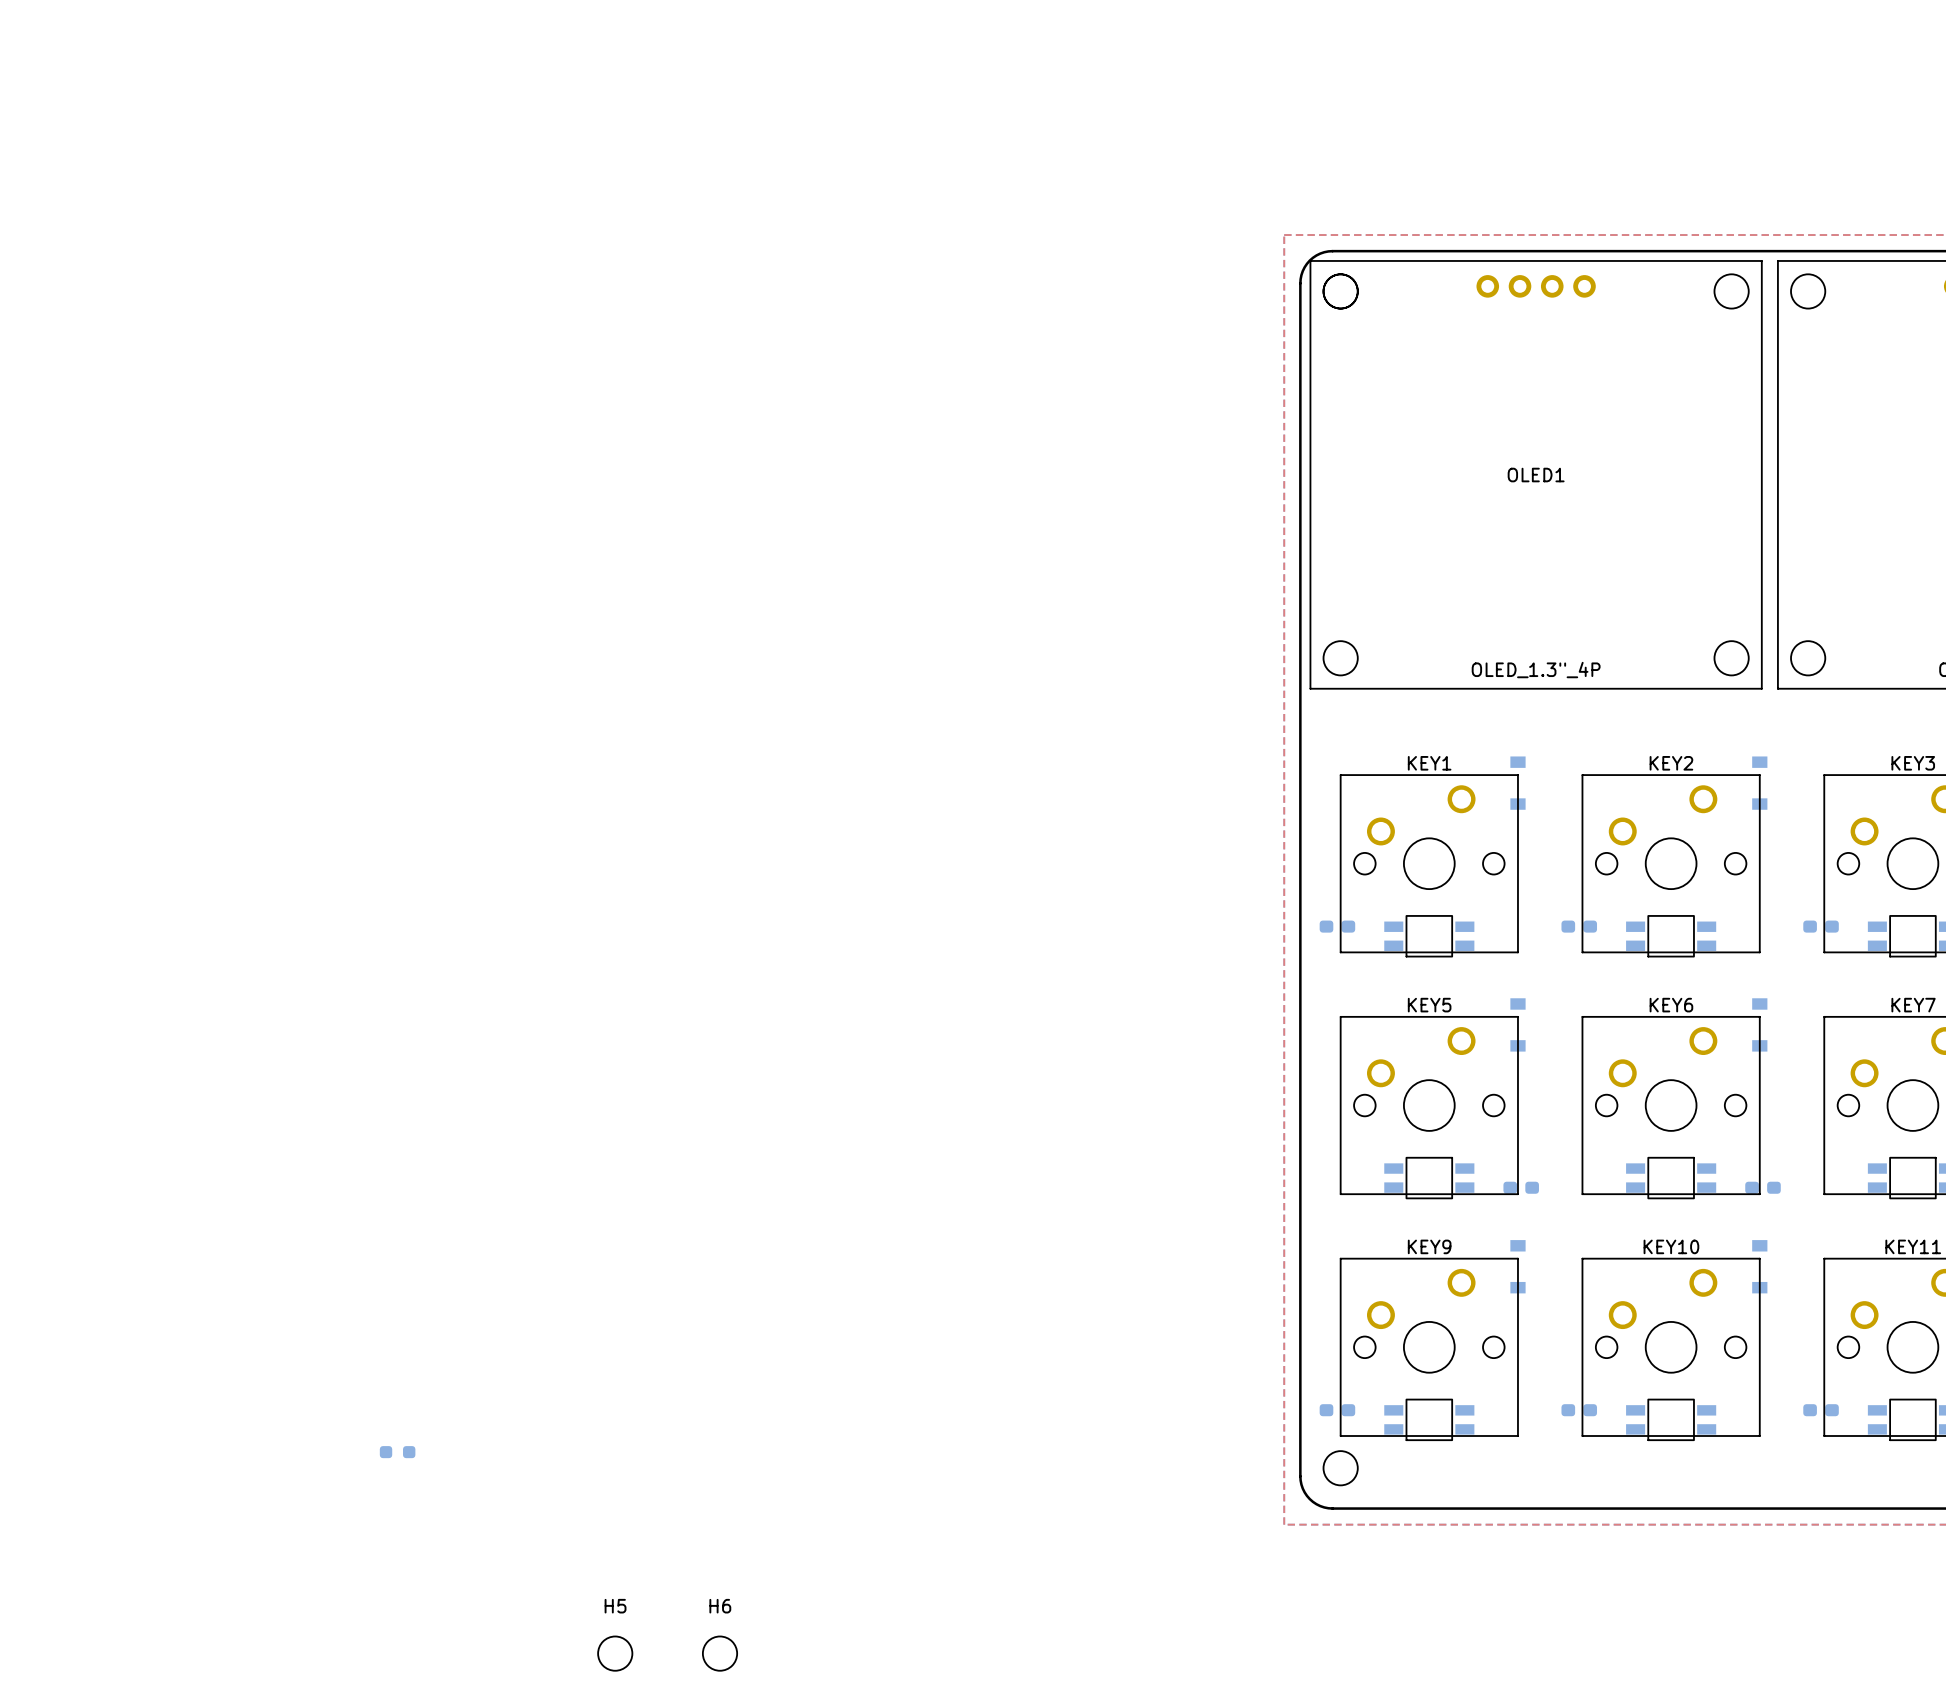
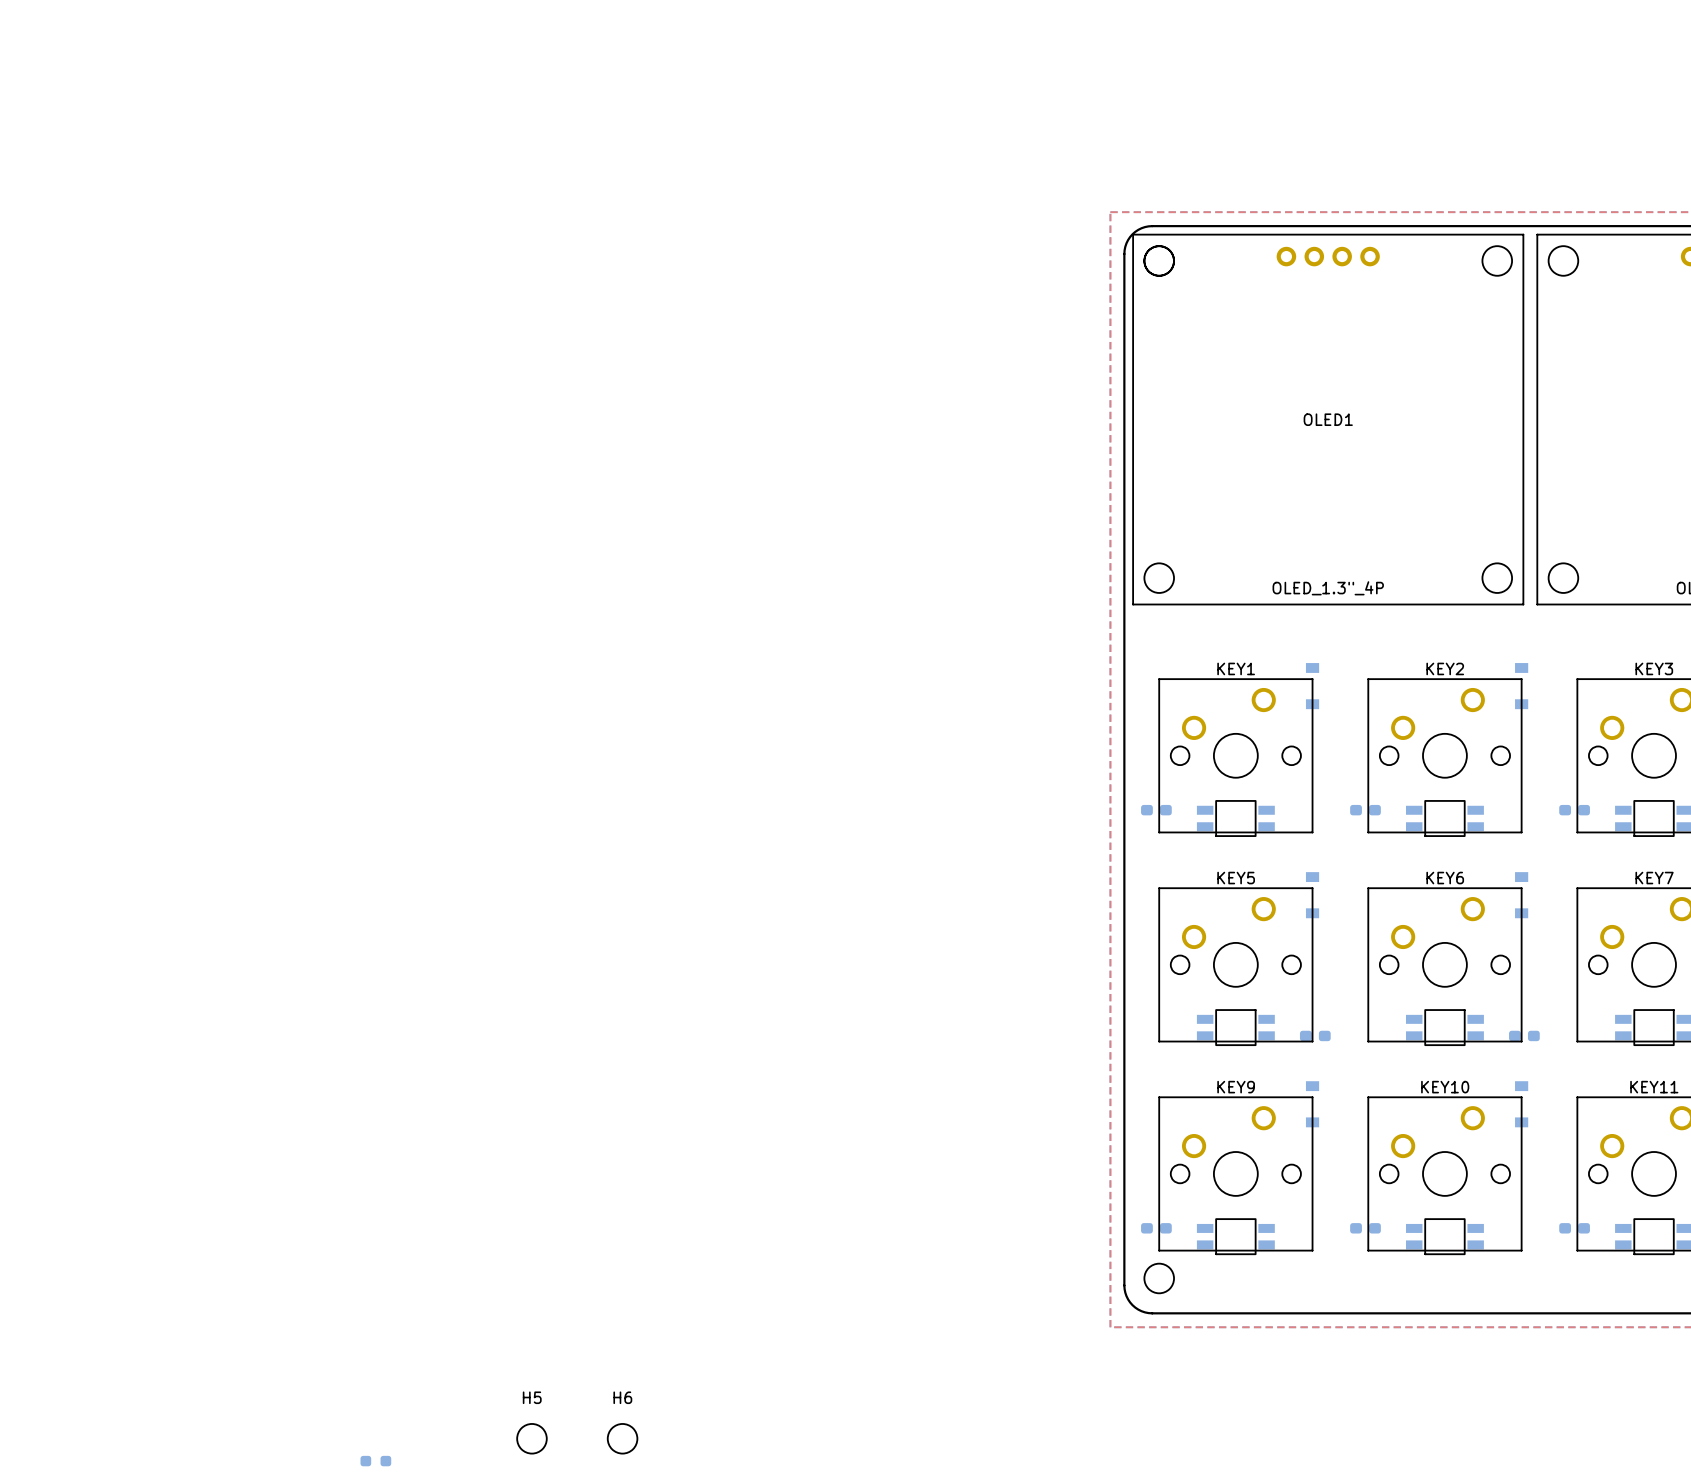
part position: (397, 1452) -> (375, 1461)

